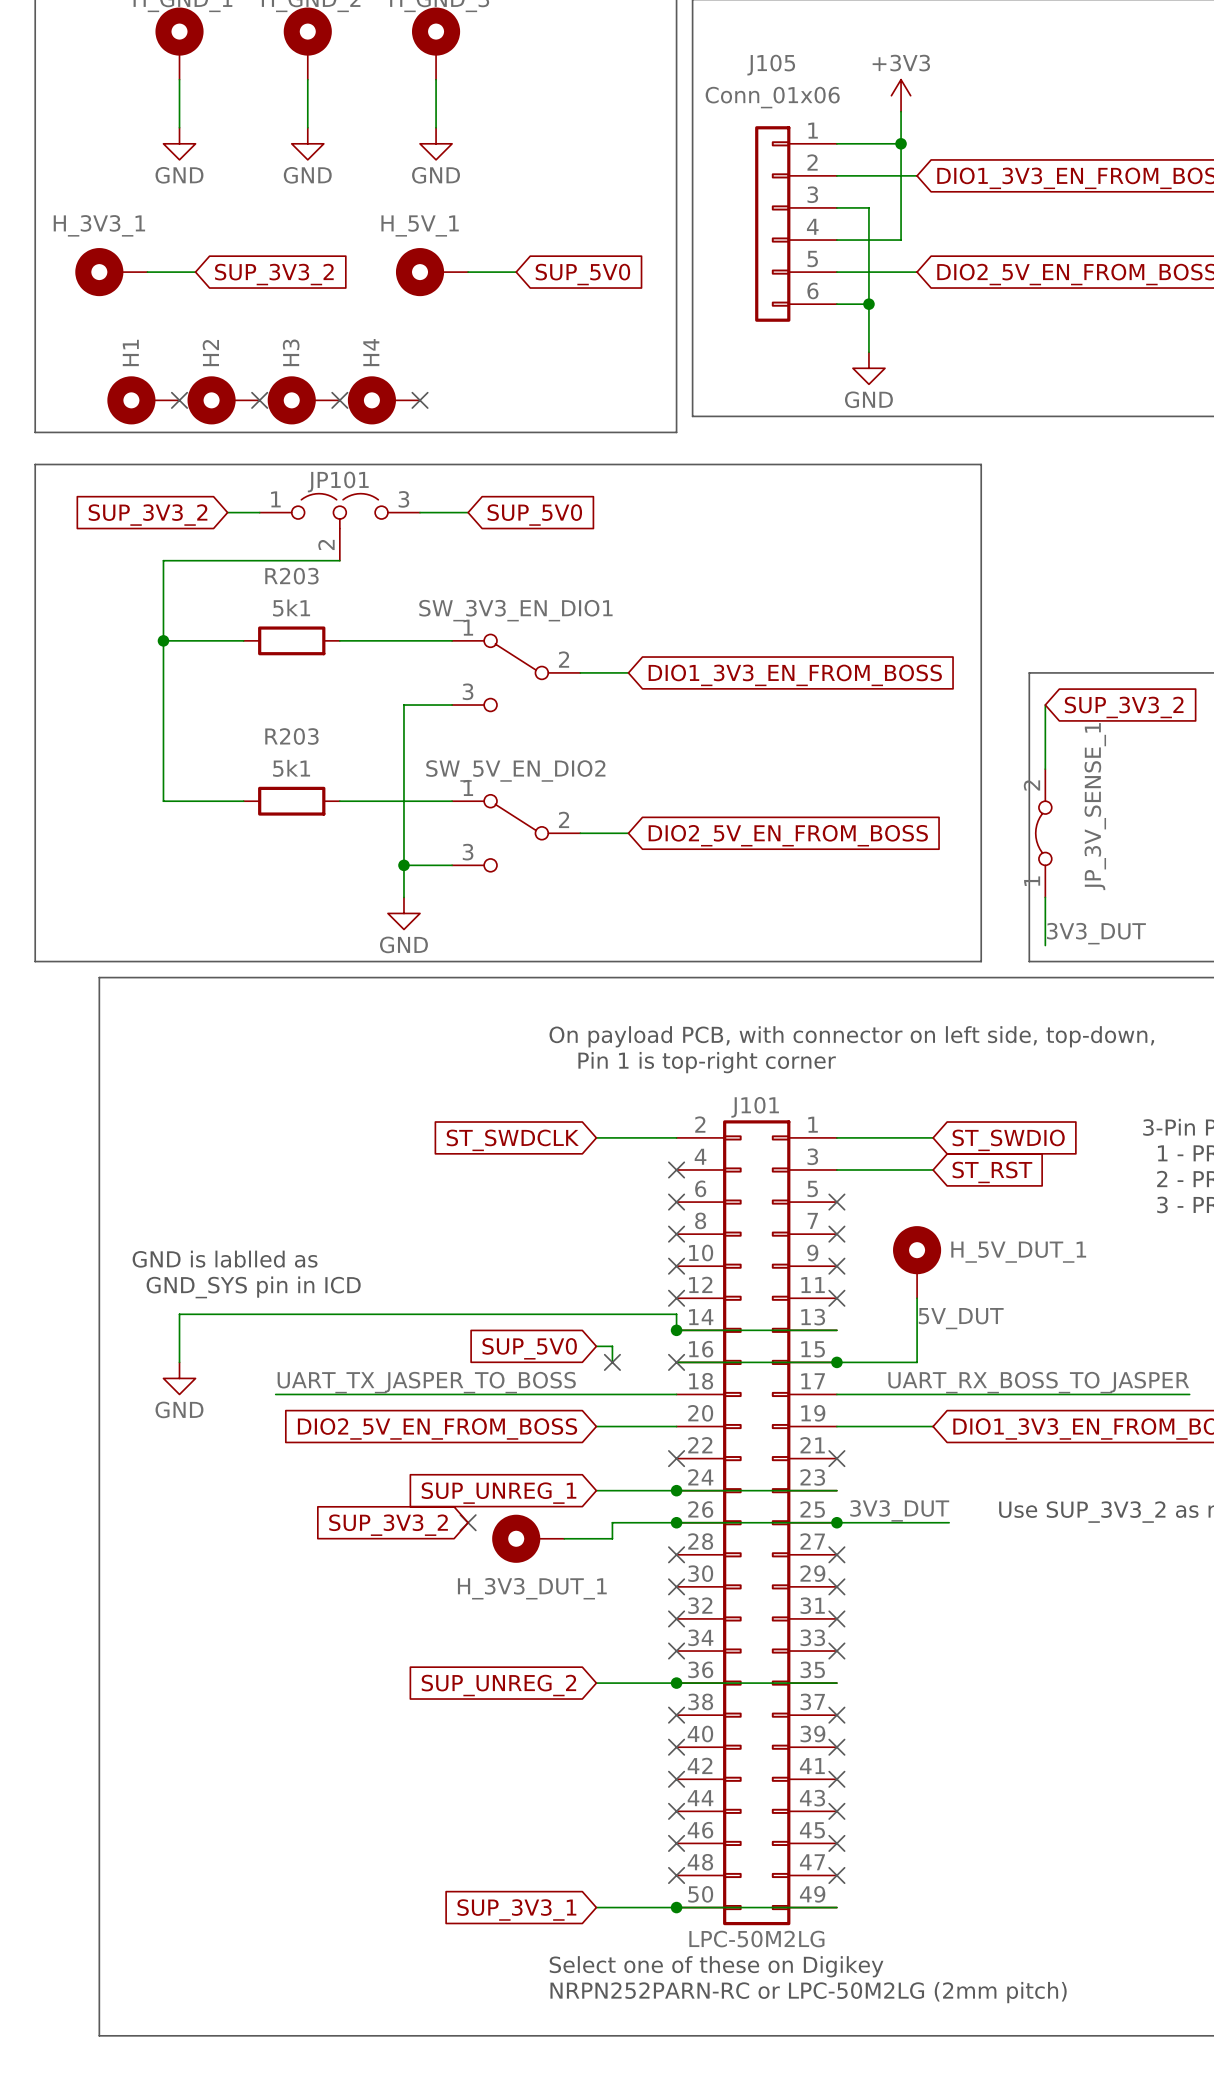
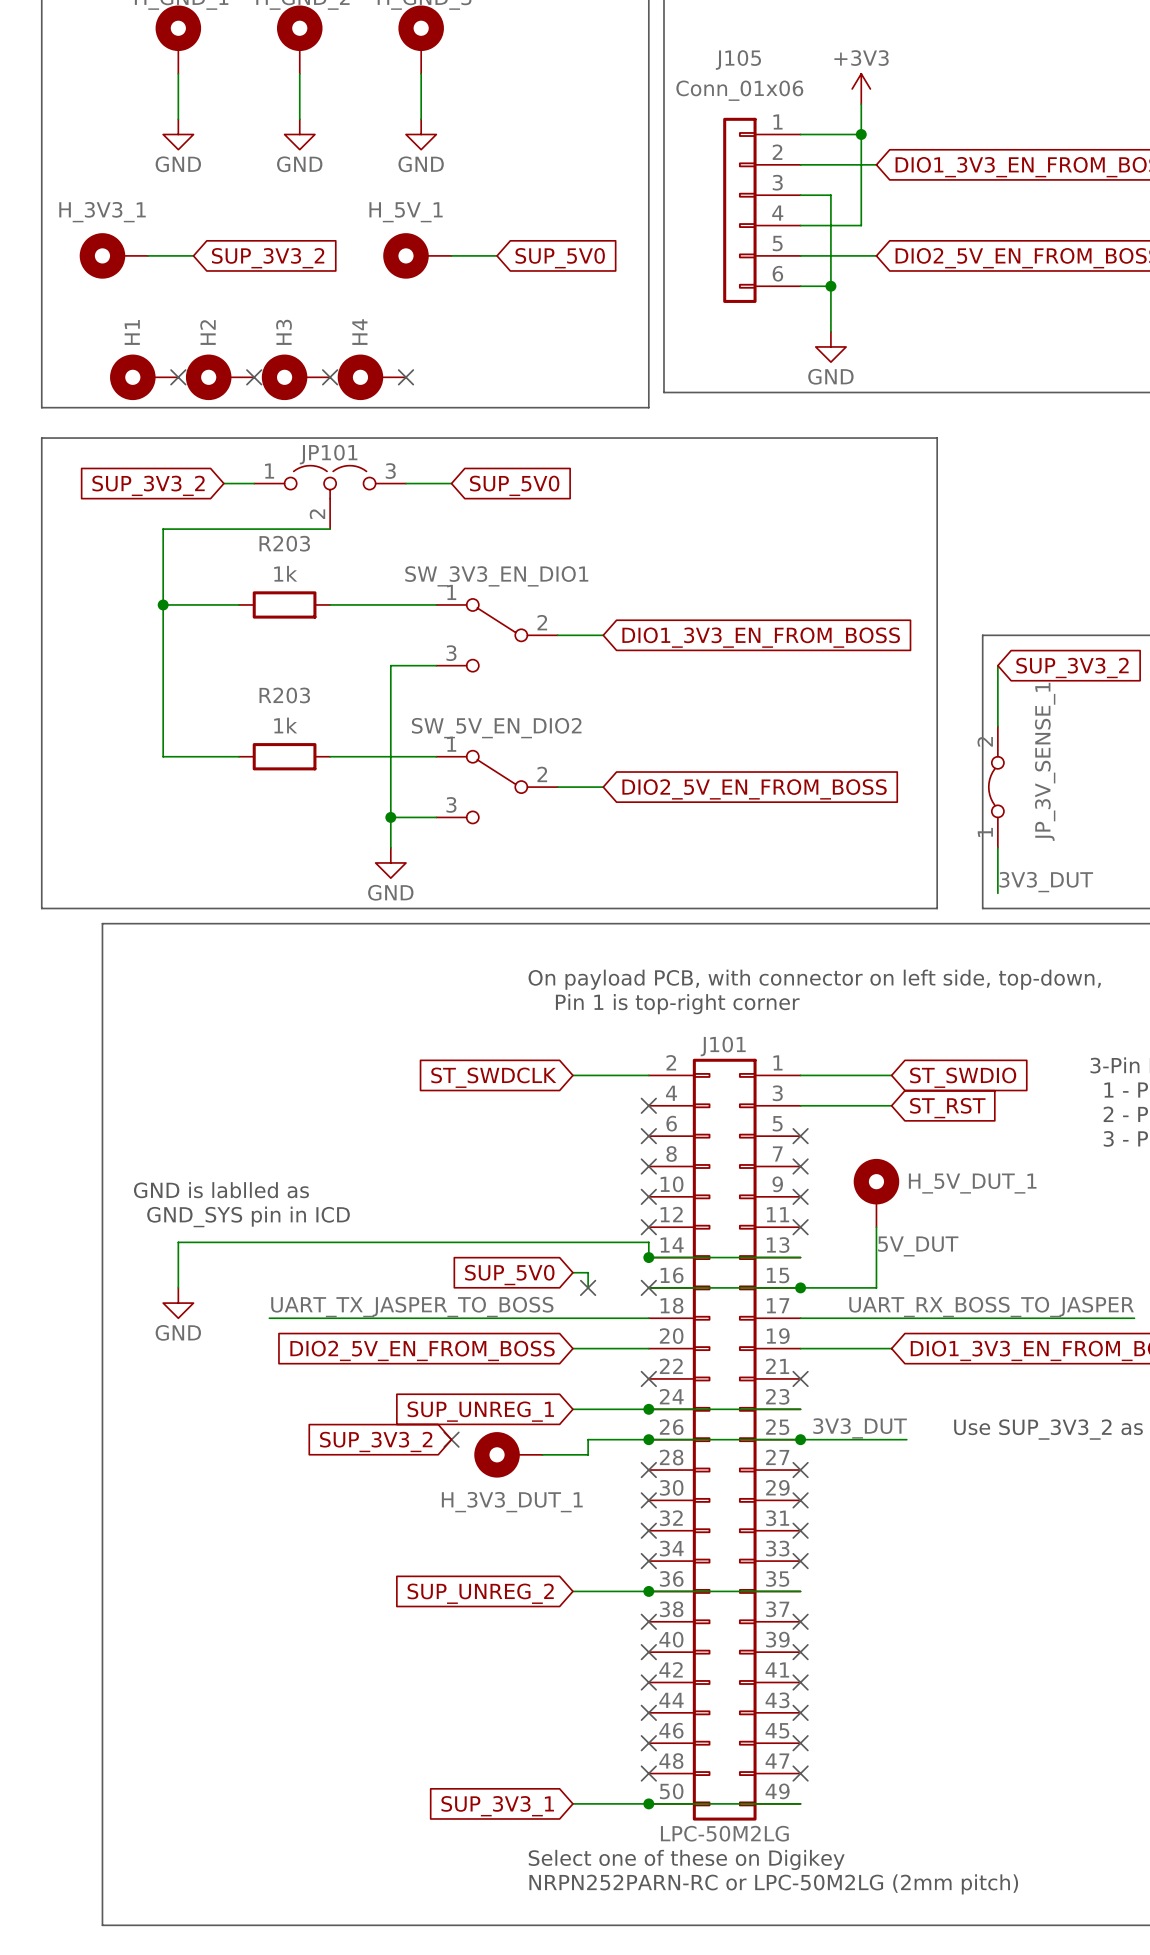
R203 value: 5k1 (291, 608) -> 1k (285, 573)
R203 value: 5k1 (291, 768) -> 1k (285, 725)

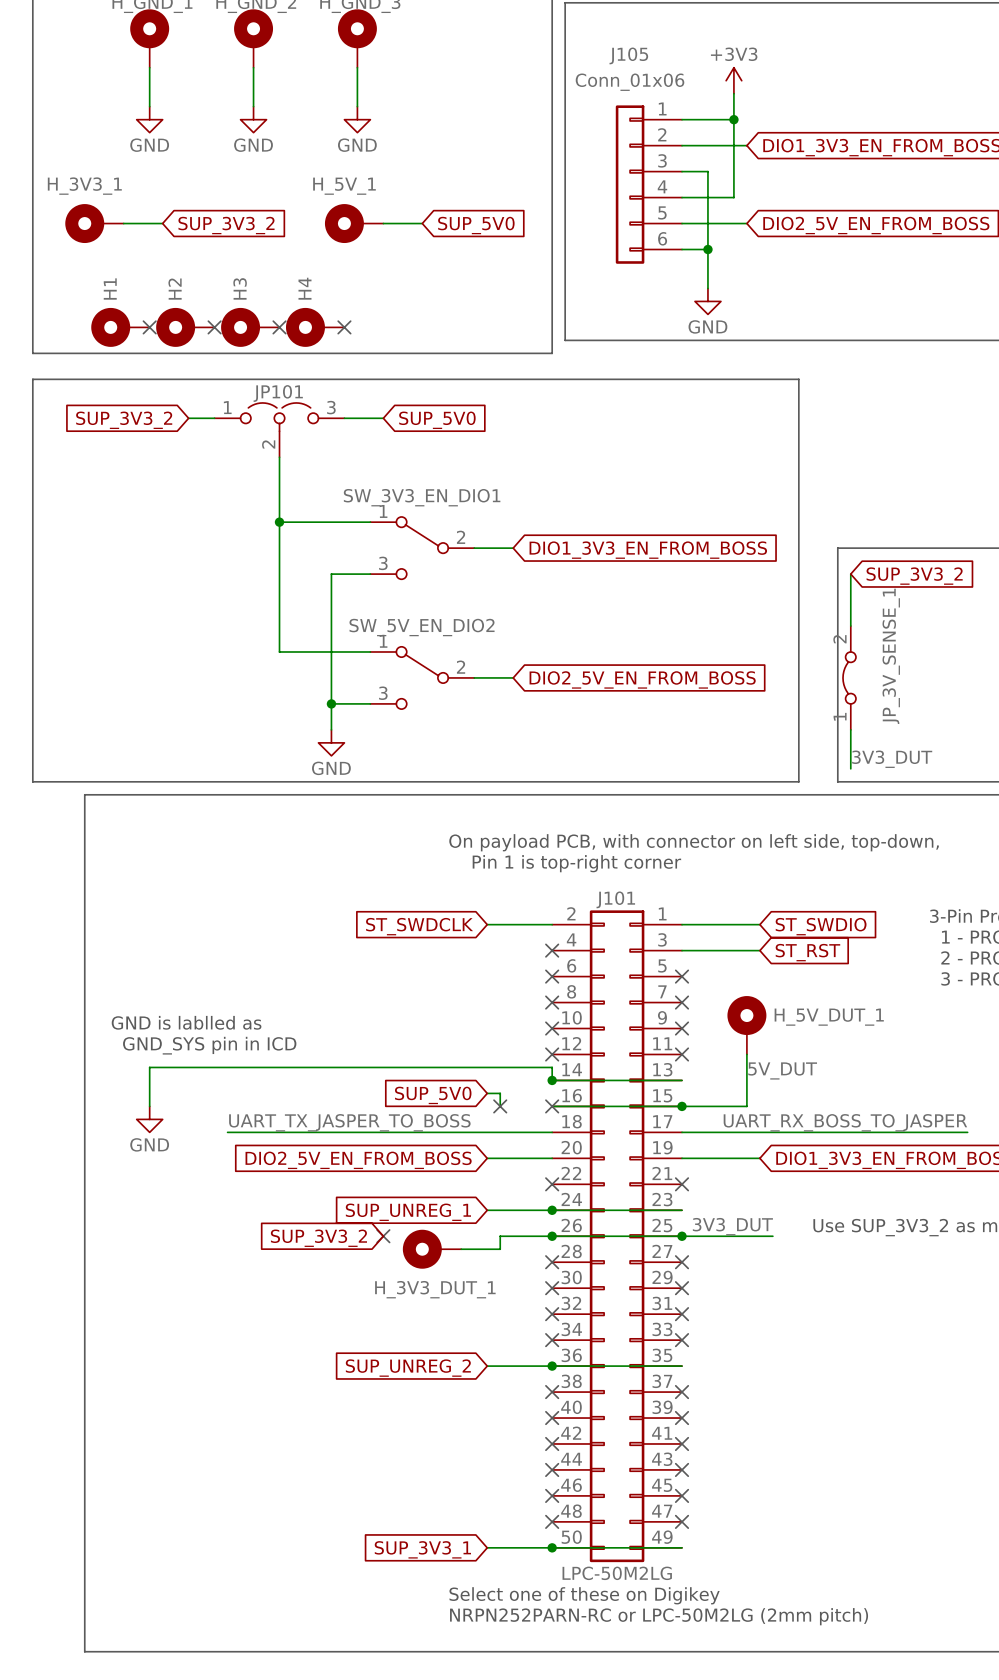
wire: (330, 529) (163, 529) (163, 756) (239, 756) -> (279, 457) (279, 651)
wire: (163, 604) (239, 604) -> none
junction: (163, 604) -> none
R203: 1k (284, 604) -> none
junction: none -> (279, 522)
R203: 1k (284, 756) -> none

